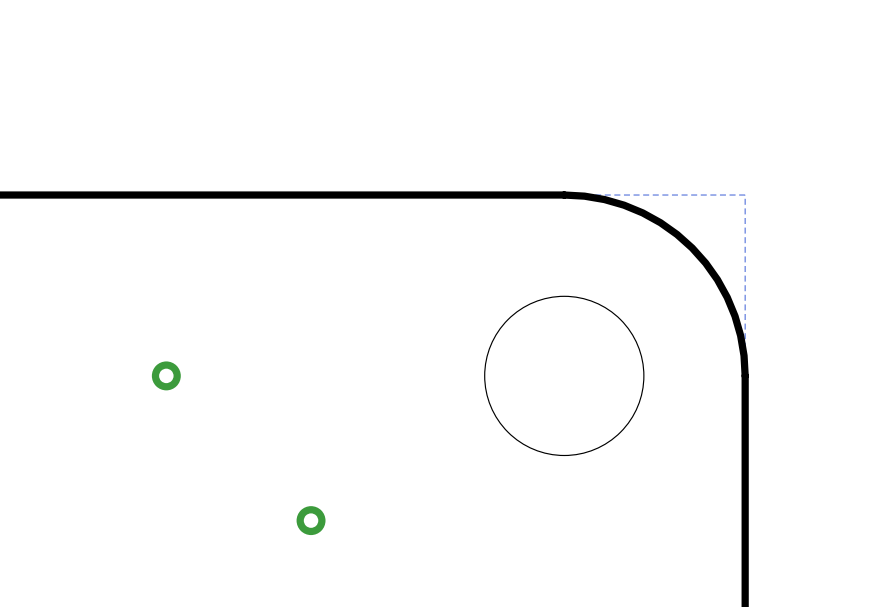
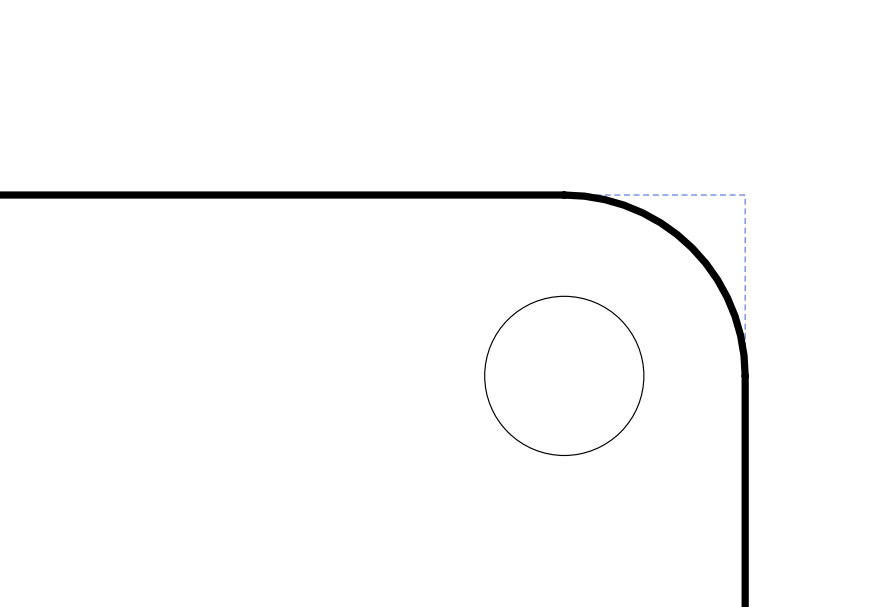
via: (166, 375) -> none
via: (311, 520) -> none

